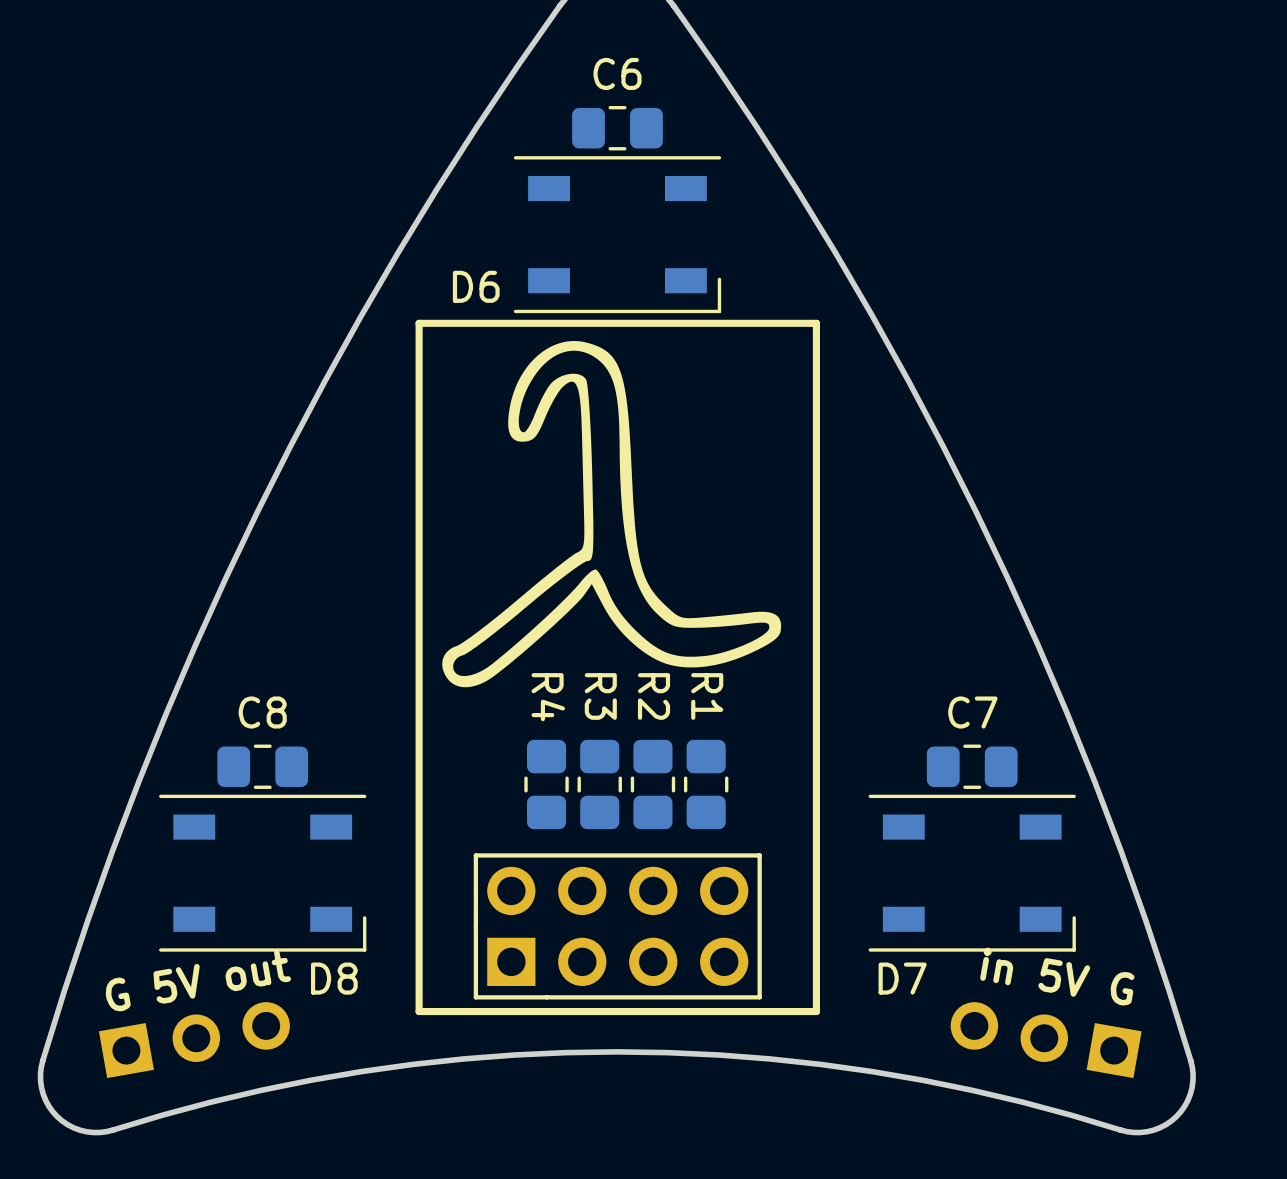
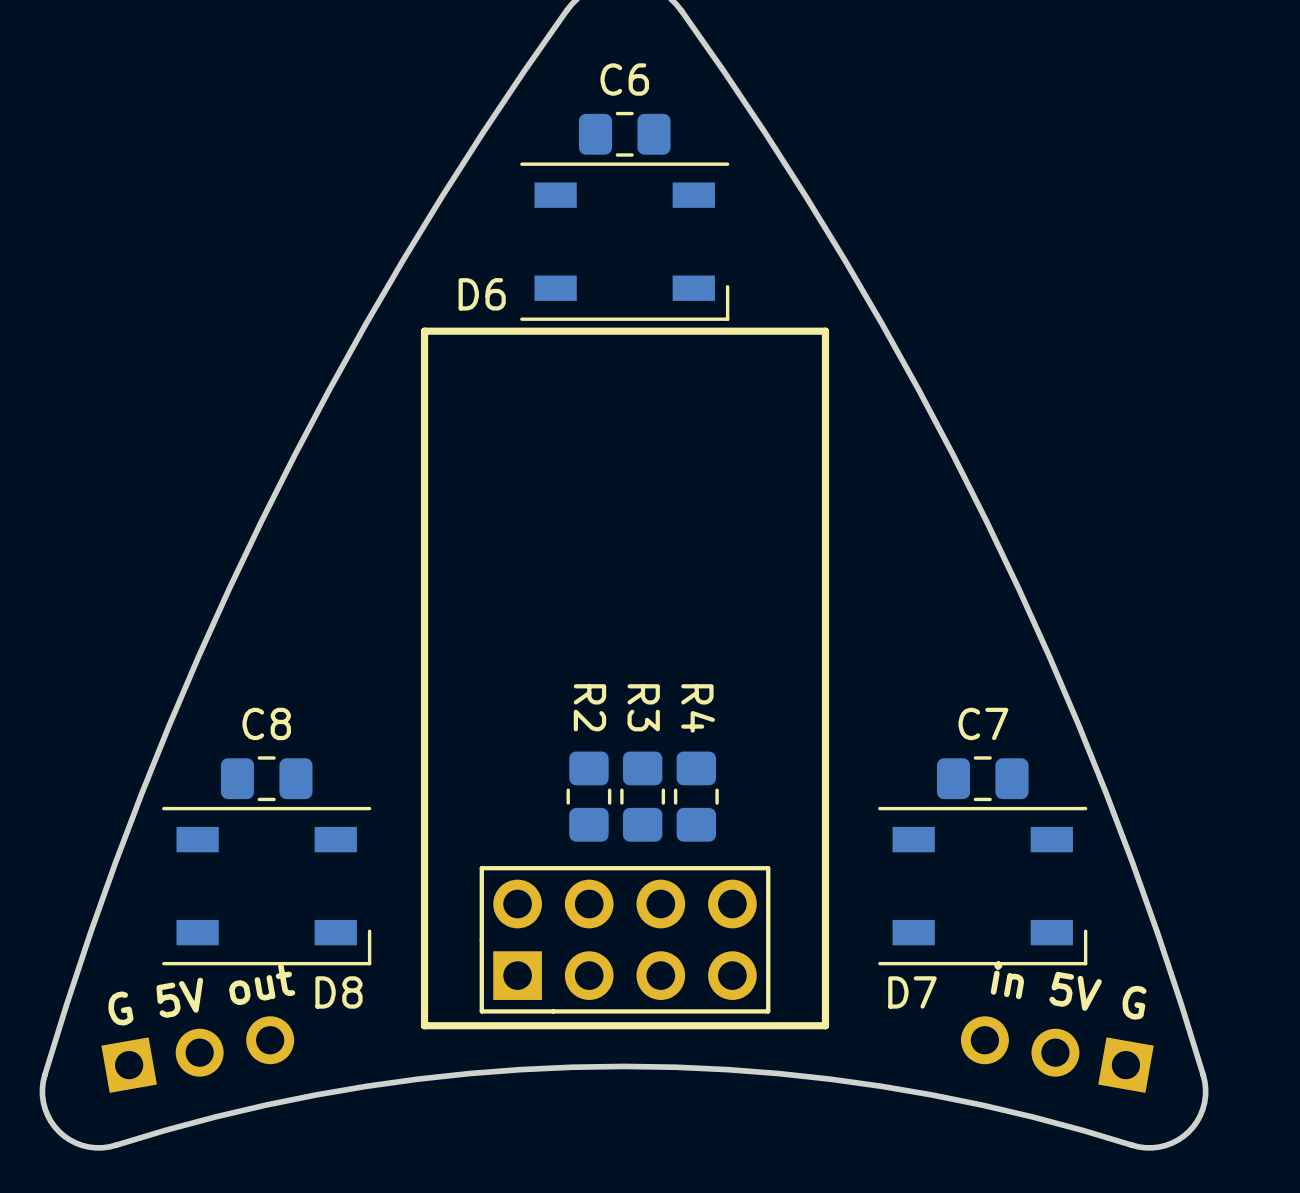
drawing: [442, 341, 782, 688] -> none
R4 position: (546, 784) -> (696, 796)
R3 position: (599, 784) -> (642, 796)
R2 position: (652, 784) -> (588, 796)
R1: (706, 784) -> none

